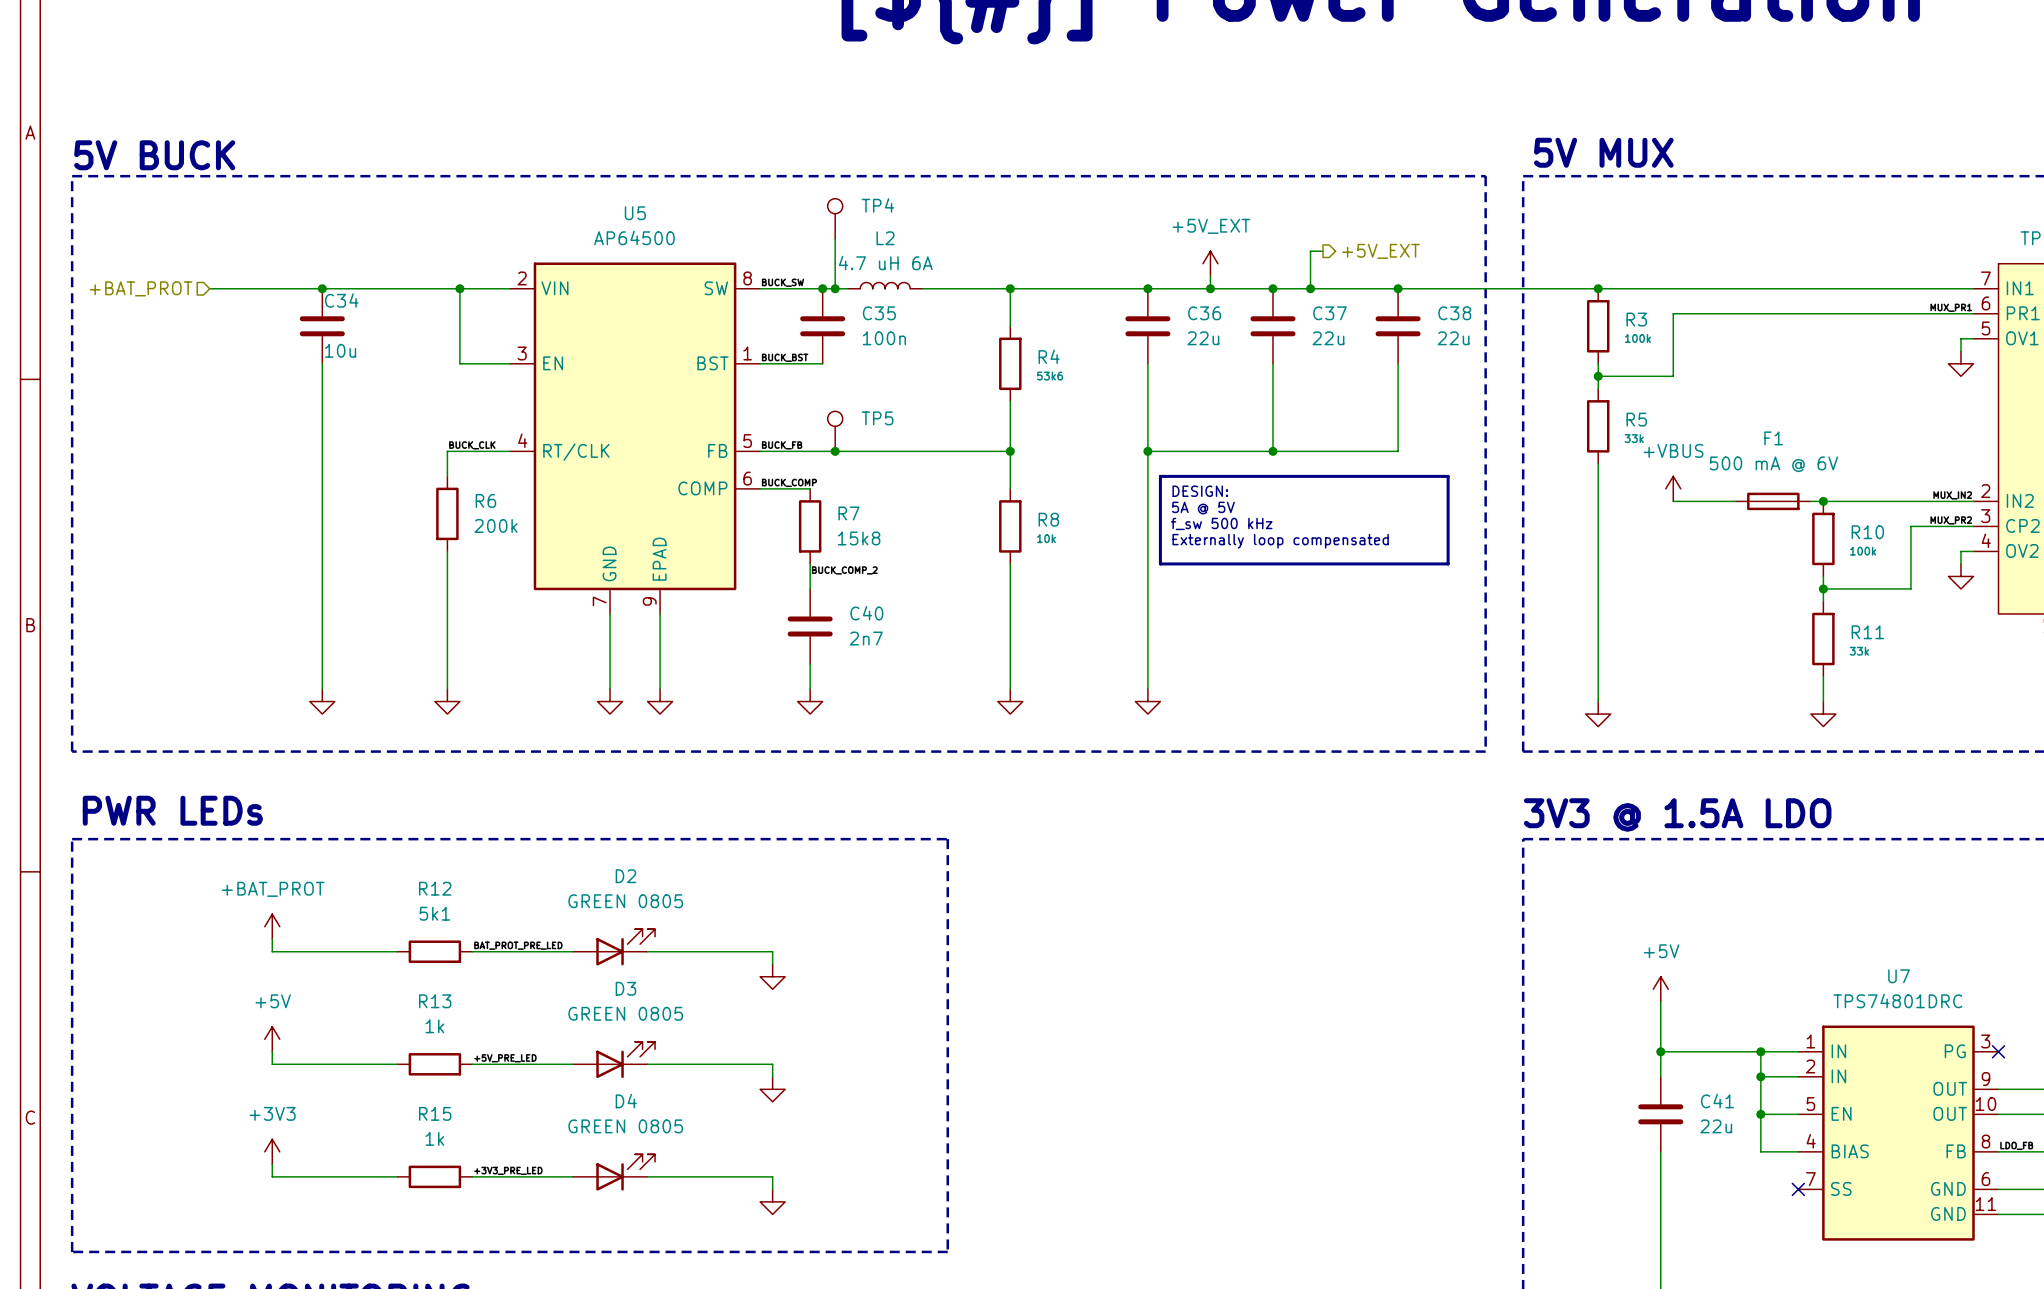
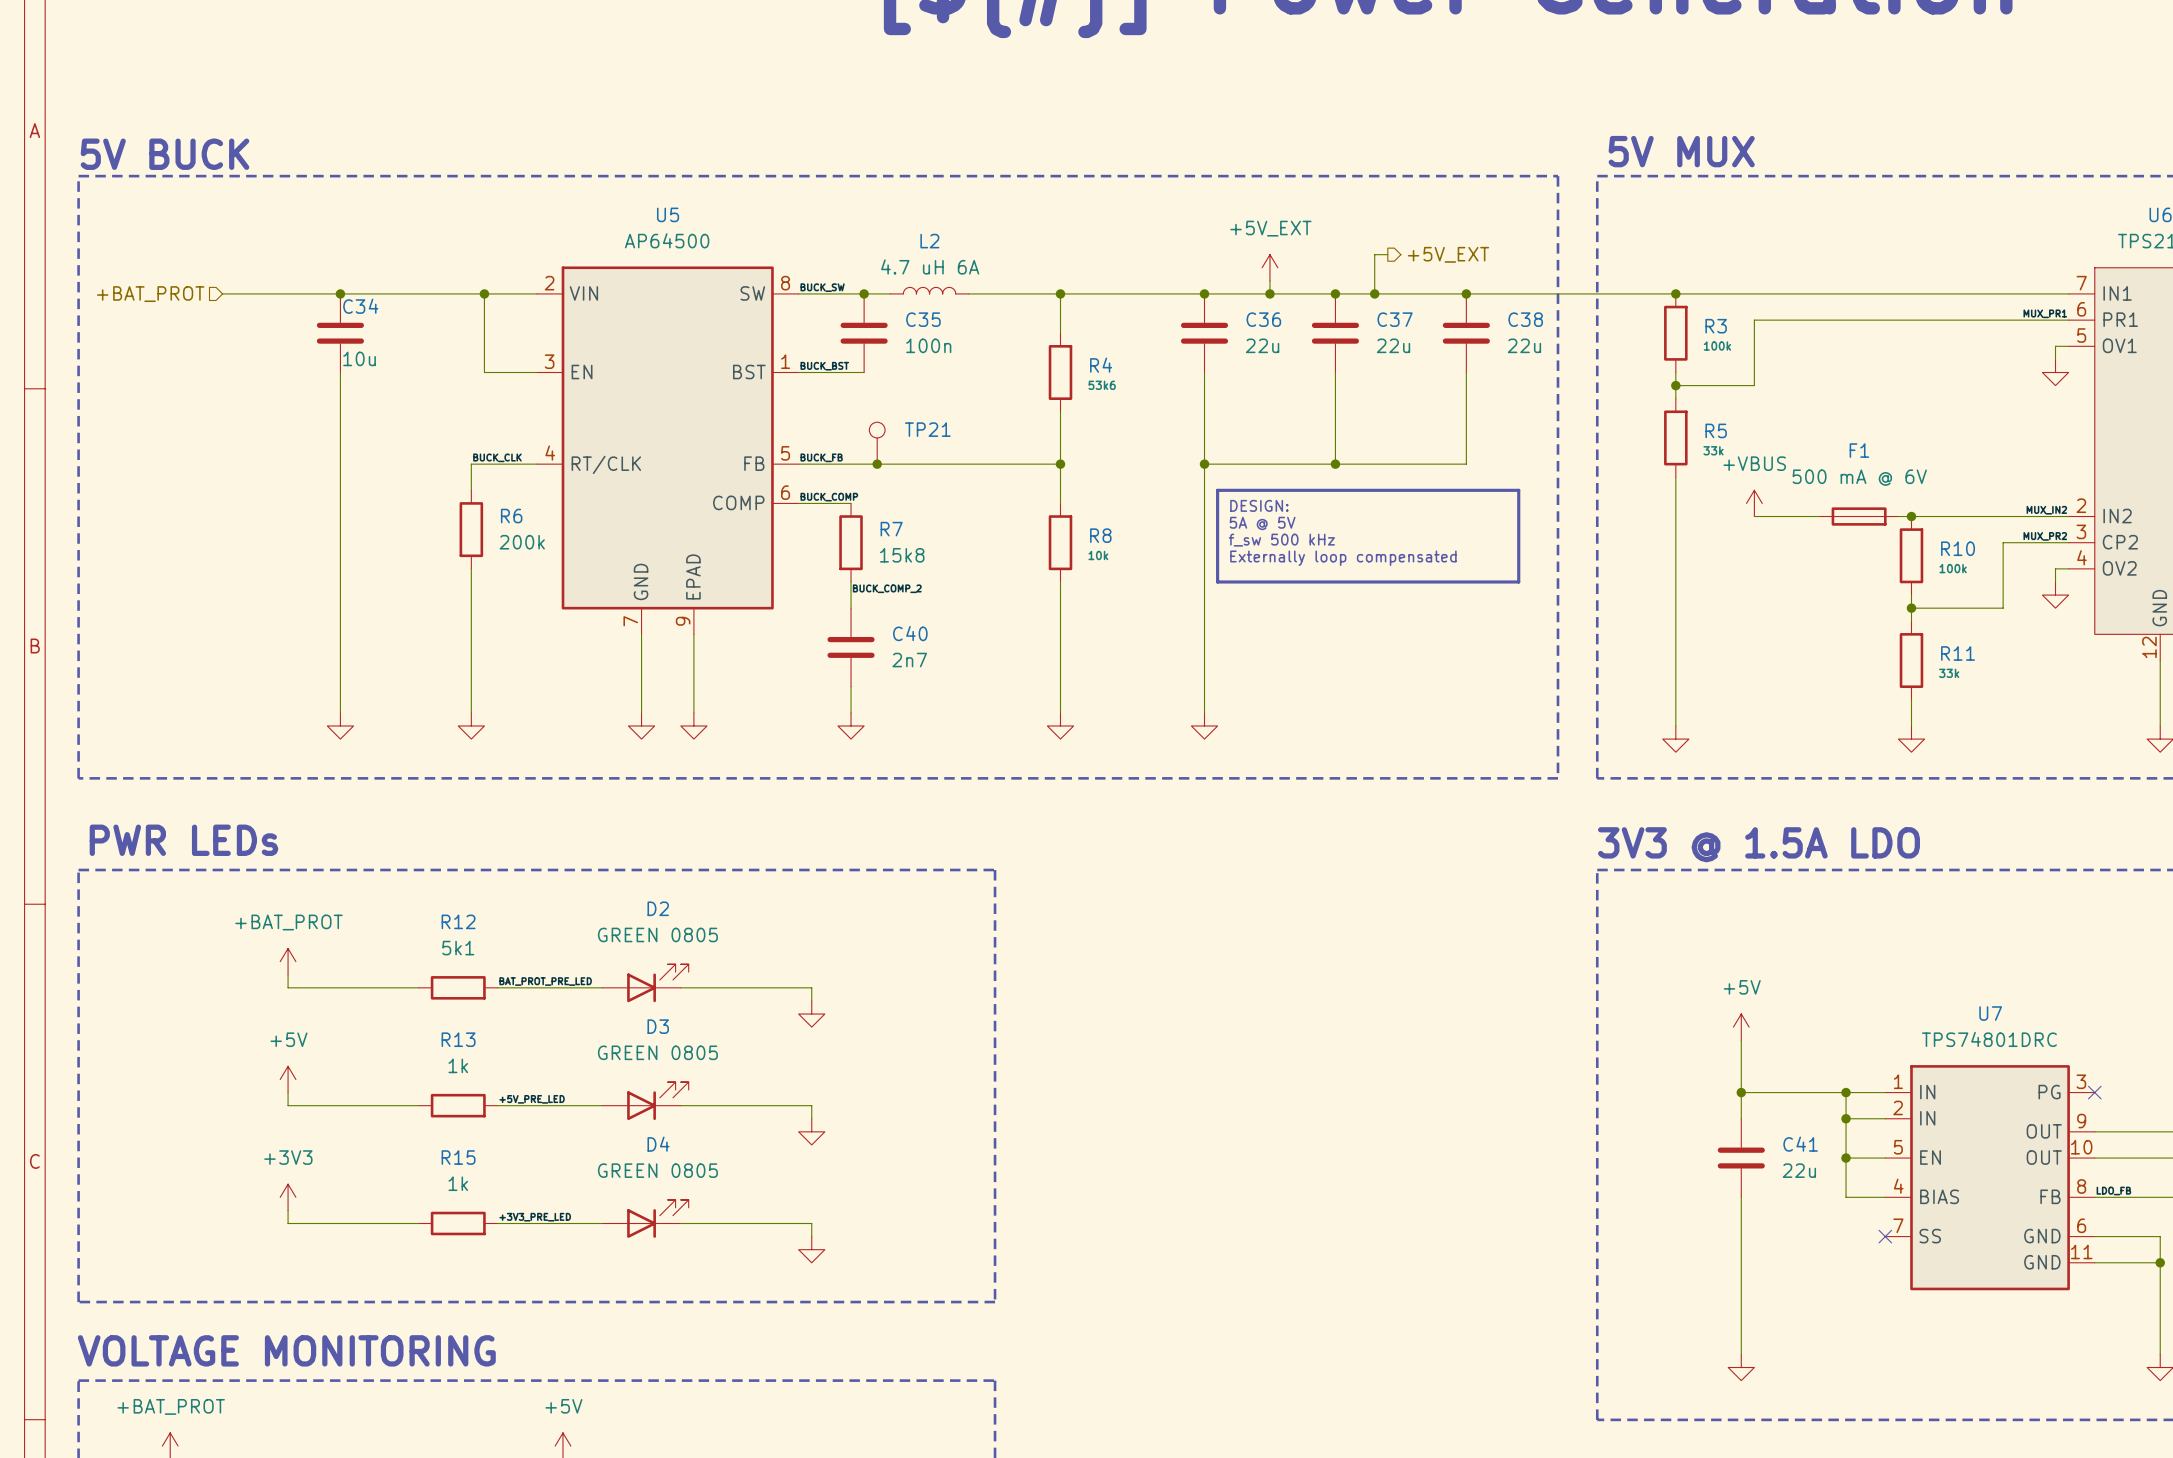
TP4: (835, 218) -> none
wire: (835, 238) (835, 288) -> none
junction: (835, 288) -> none
TP5 name: TP5 (877, 418) -> TP21 (927, 429)

